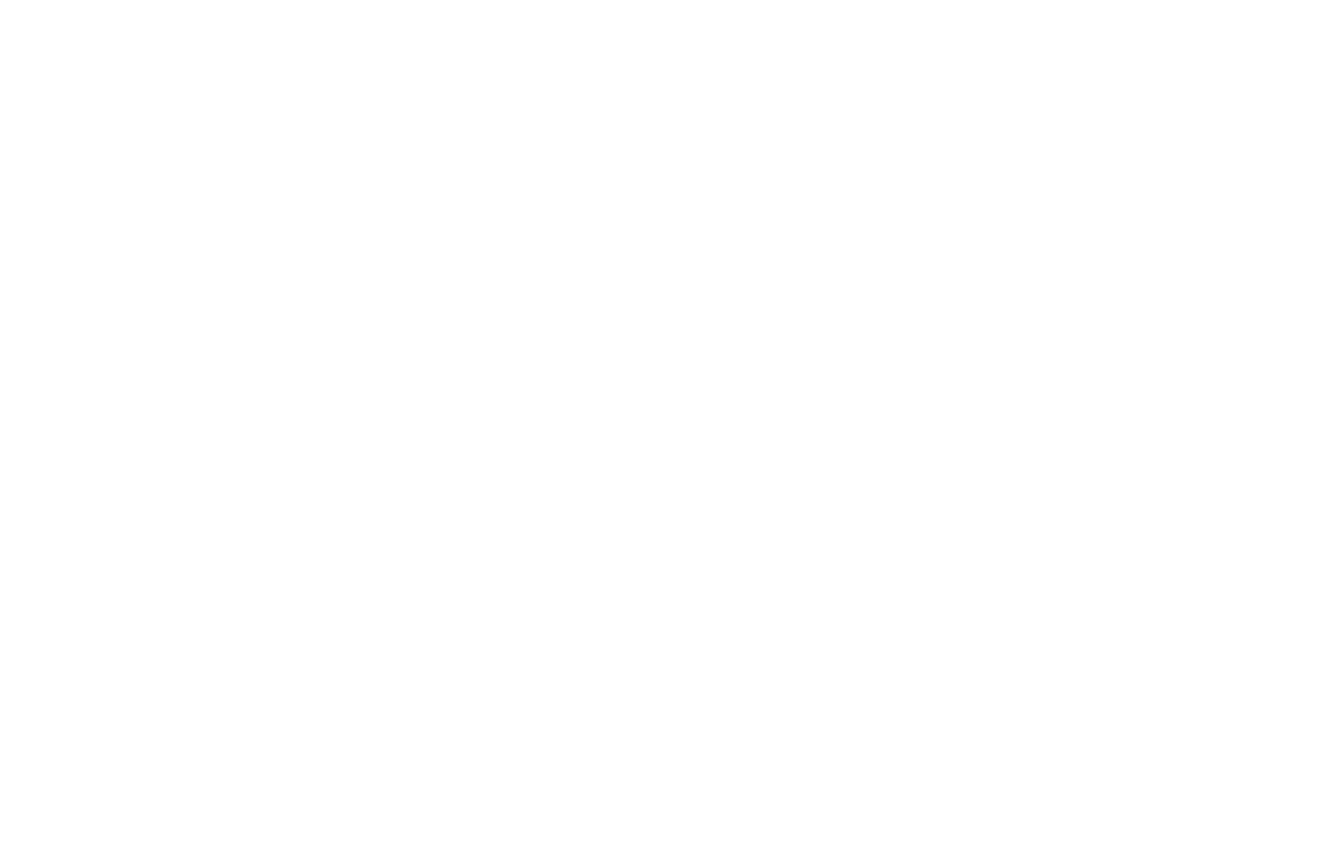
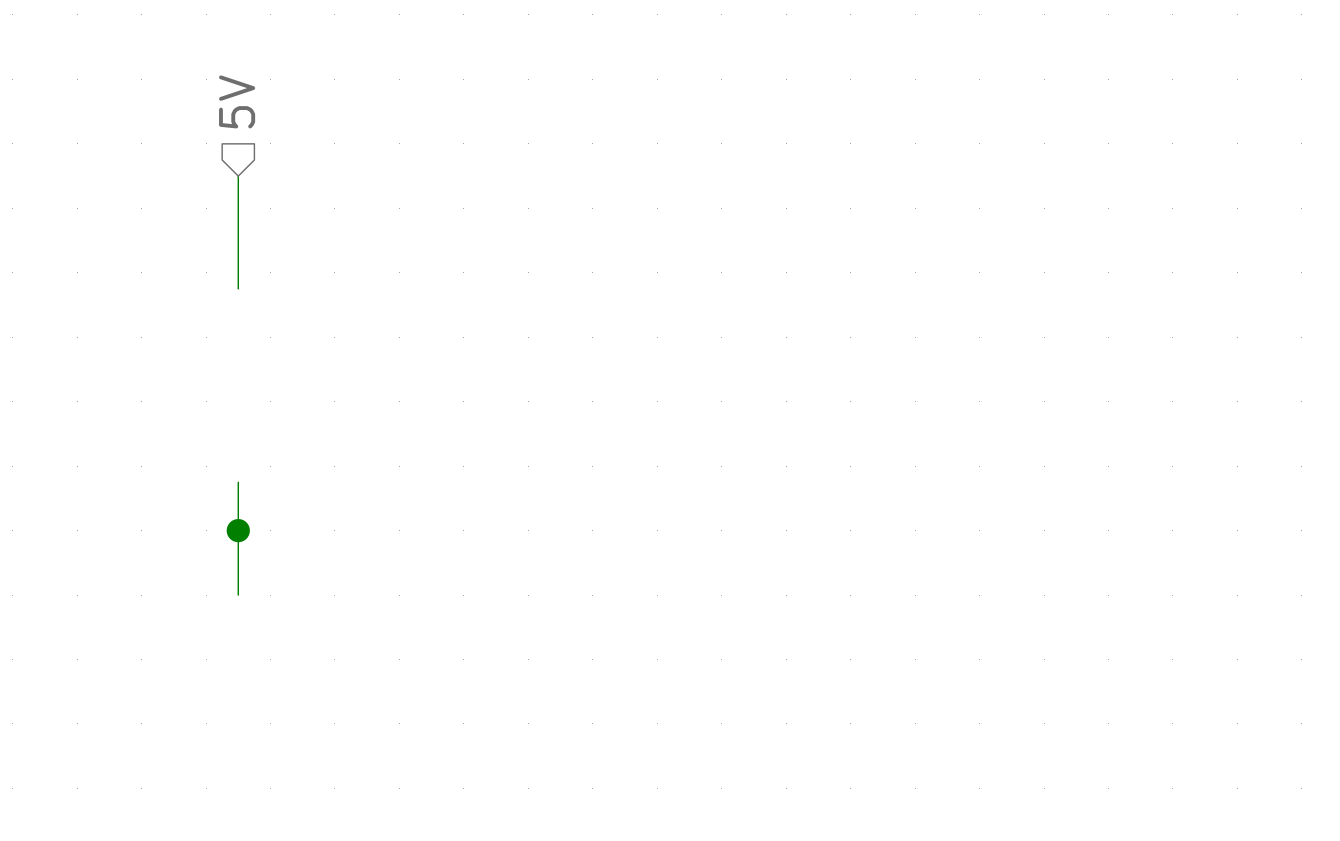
hierarchical label: none -> 5V (237, 101)
wire: none -> (238, 176) (238, 288)
wire: none -> (238, 482) (238, 595)
junction: none -> (238, 530)

